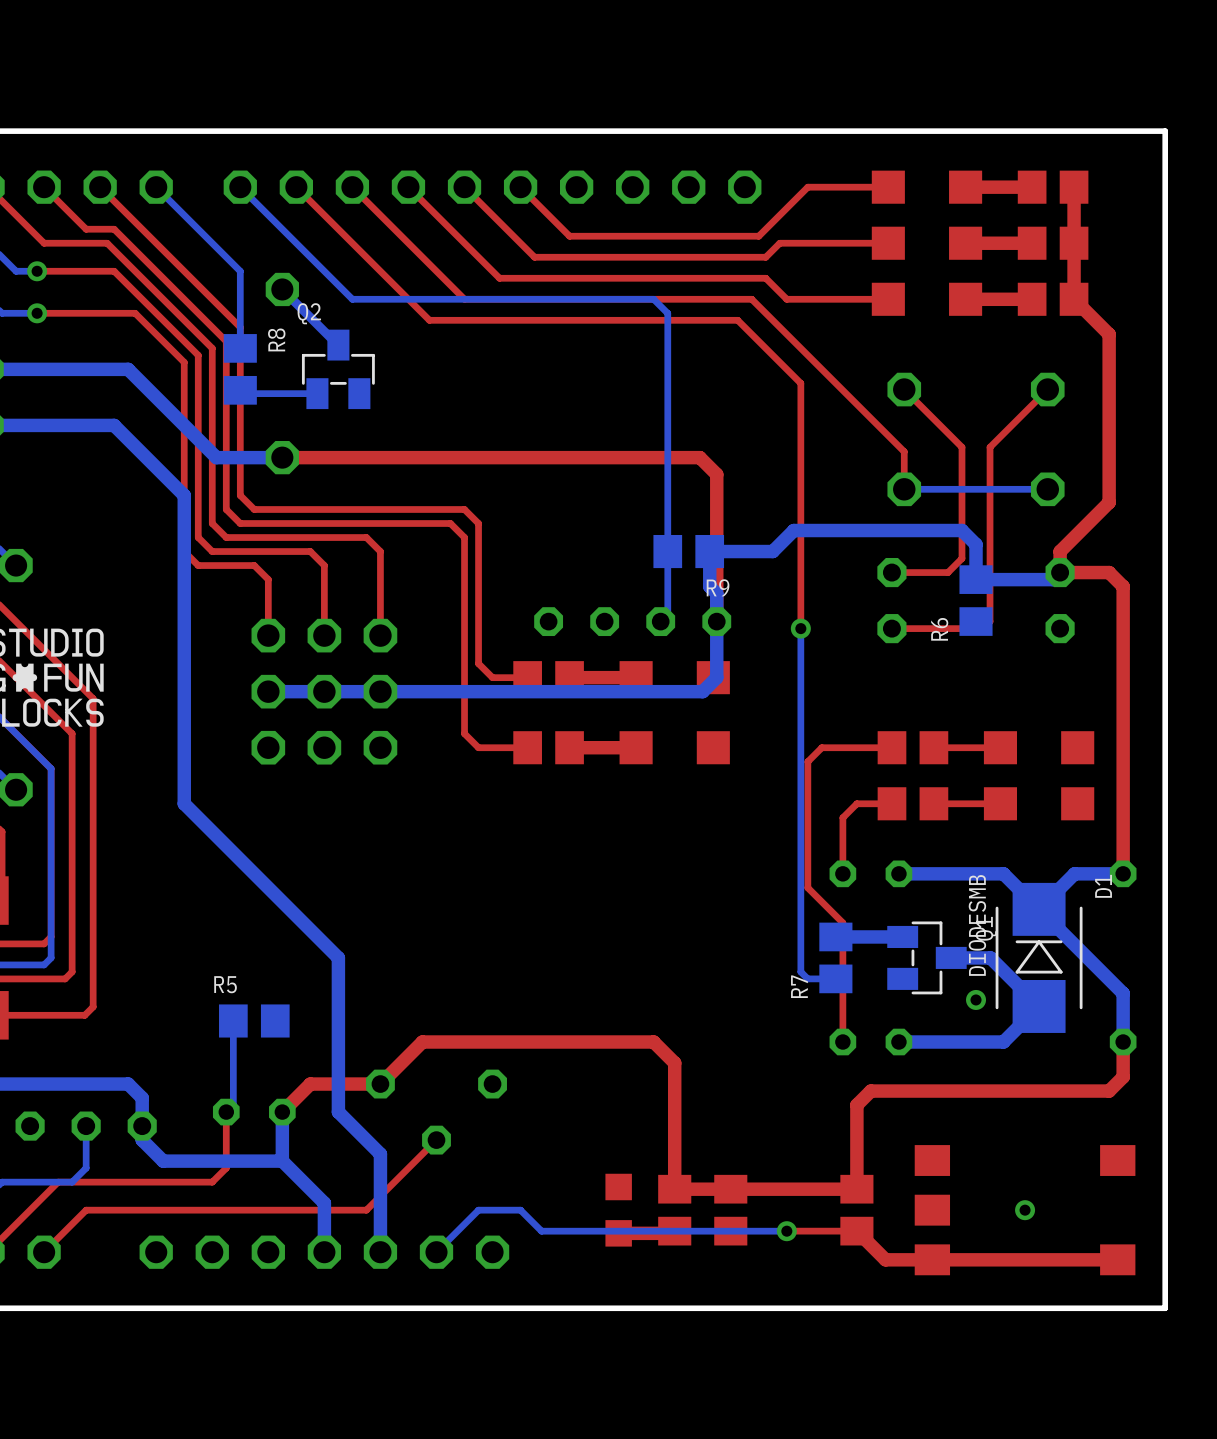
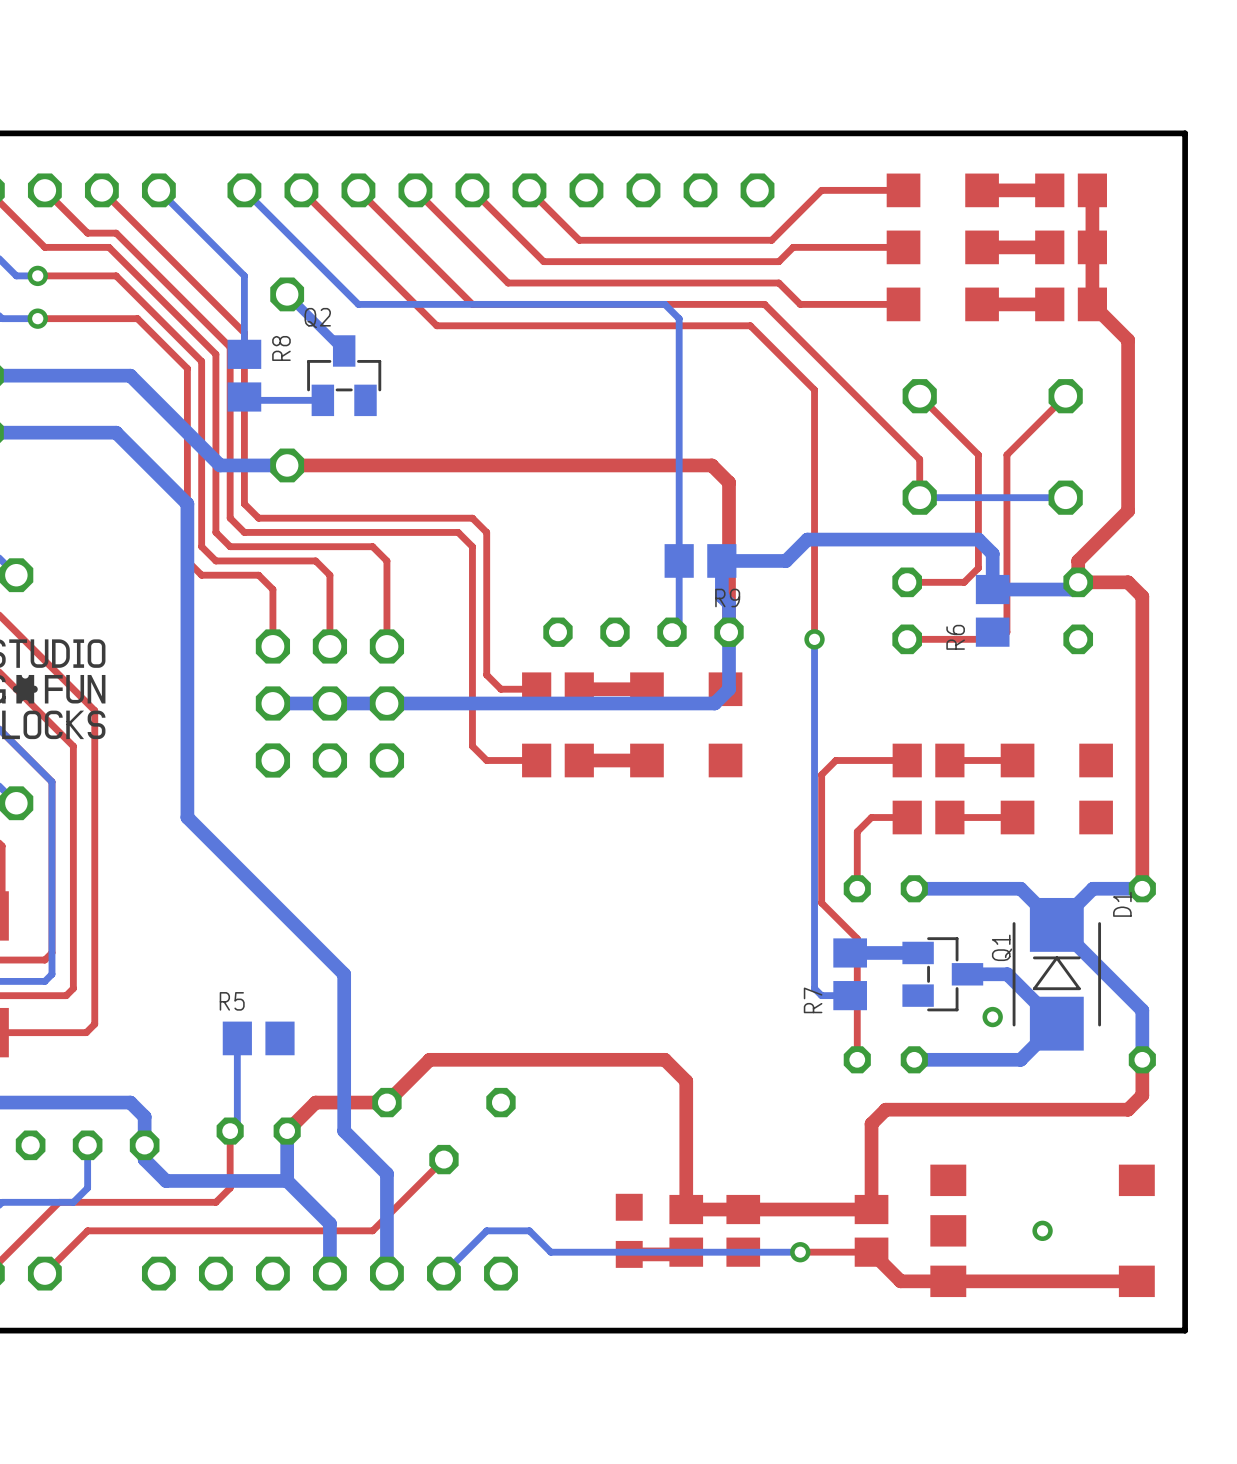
D1 value: DIODESMB (977, 925) -> none

